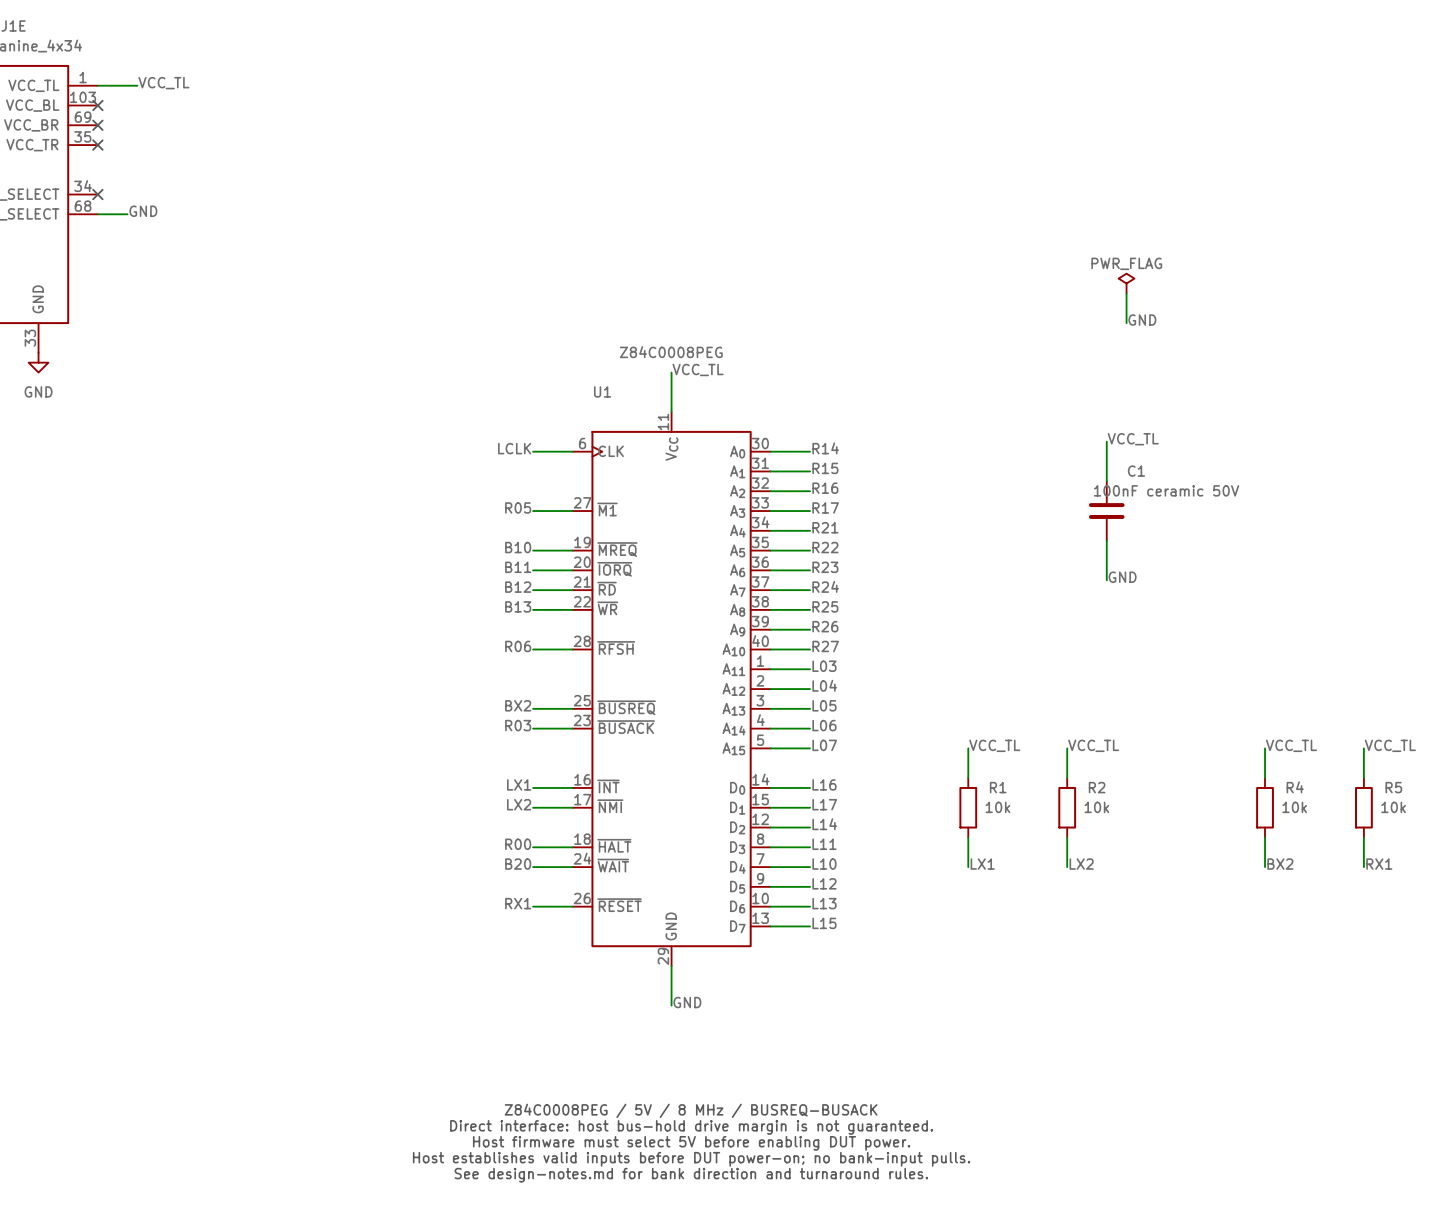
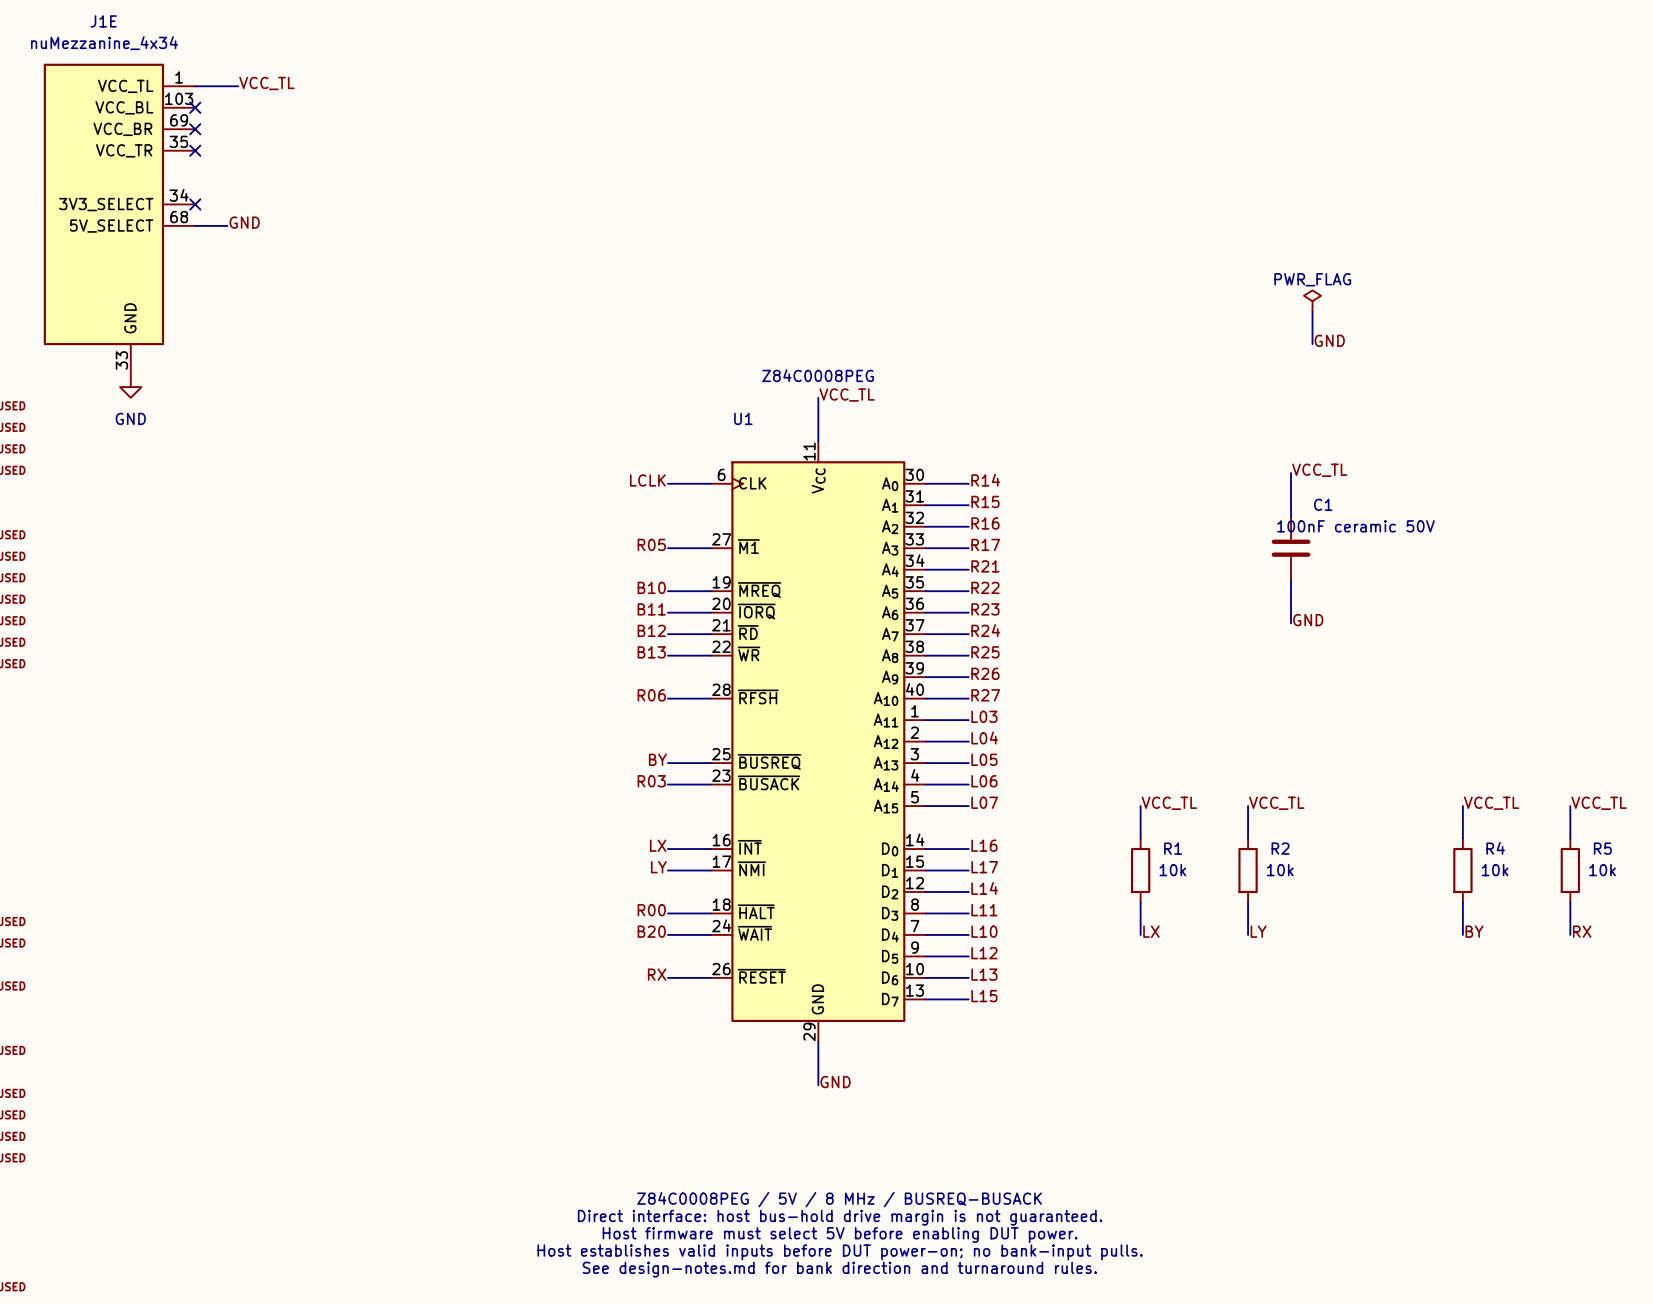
label: BX2 (518, 705) -> BY (657, 759)
label: LX1 (519, 784) -> LX (658, 845)
label: LX2 (519, 804) -> LY (658, 867)
label: LX1 (982, 864) -> LX (1151, 931)
label: LX2 (1081, 864) -> LY (1258, 931)
label: BX2 (1280, 864) -> BY (1474, 931)
label: RX1 (1379, 864) -> RX (1582, 931)
label: RX1 (518, 903) -> RX (657, 974)

